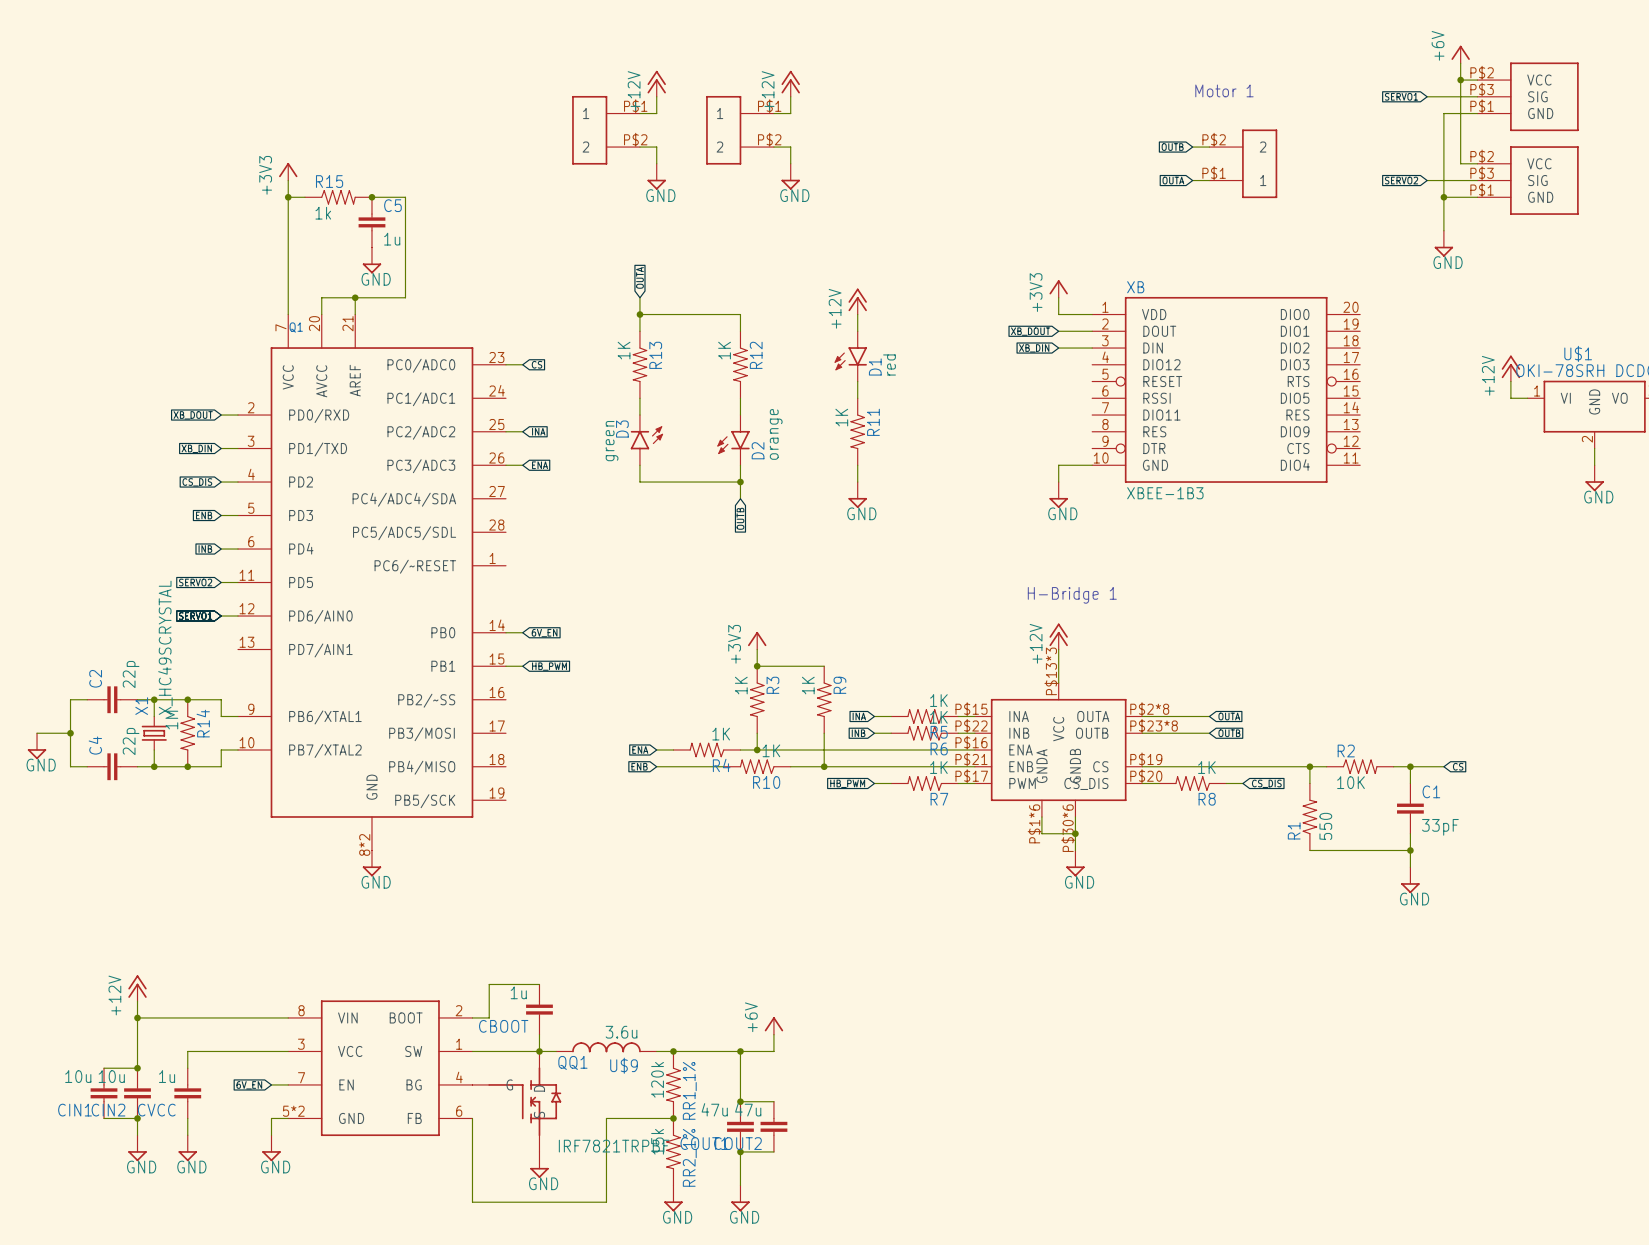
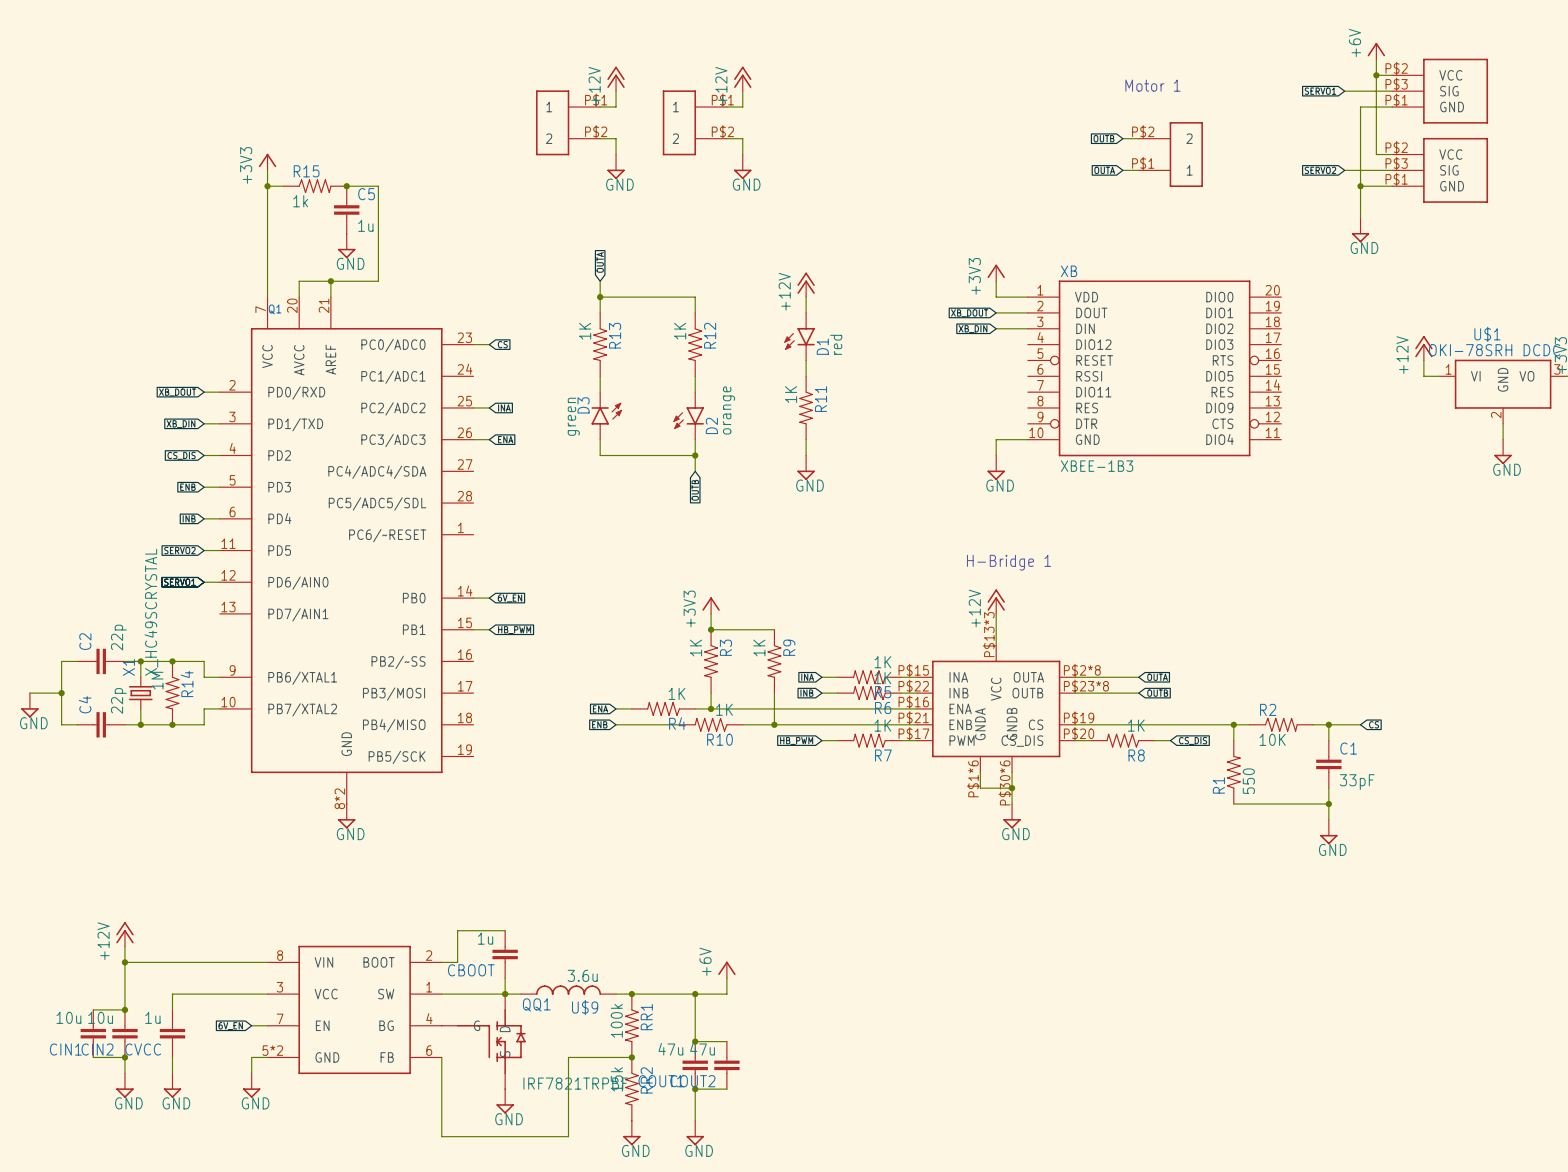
RR1_1% value: 120k (657, 1079) -> 100k (616, 1020)
RR1_1% name: RR1_1% (689, 1090) -> RR1 (646, 1017)
RR2_1% name: RR2_1% (689, 1157) -> RR2 (646, 1080)

